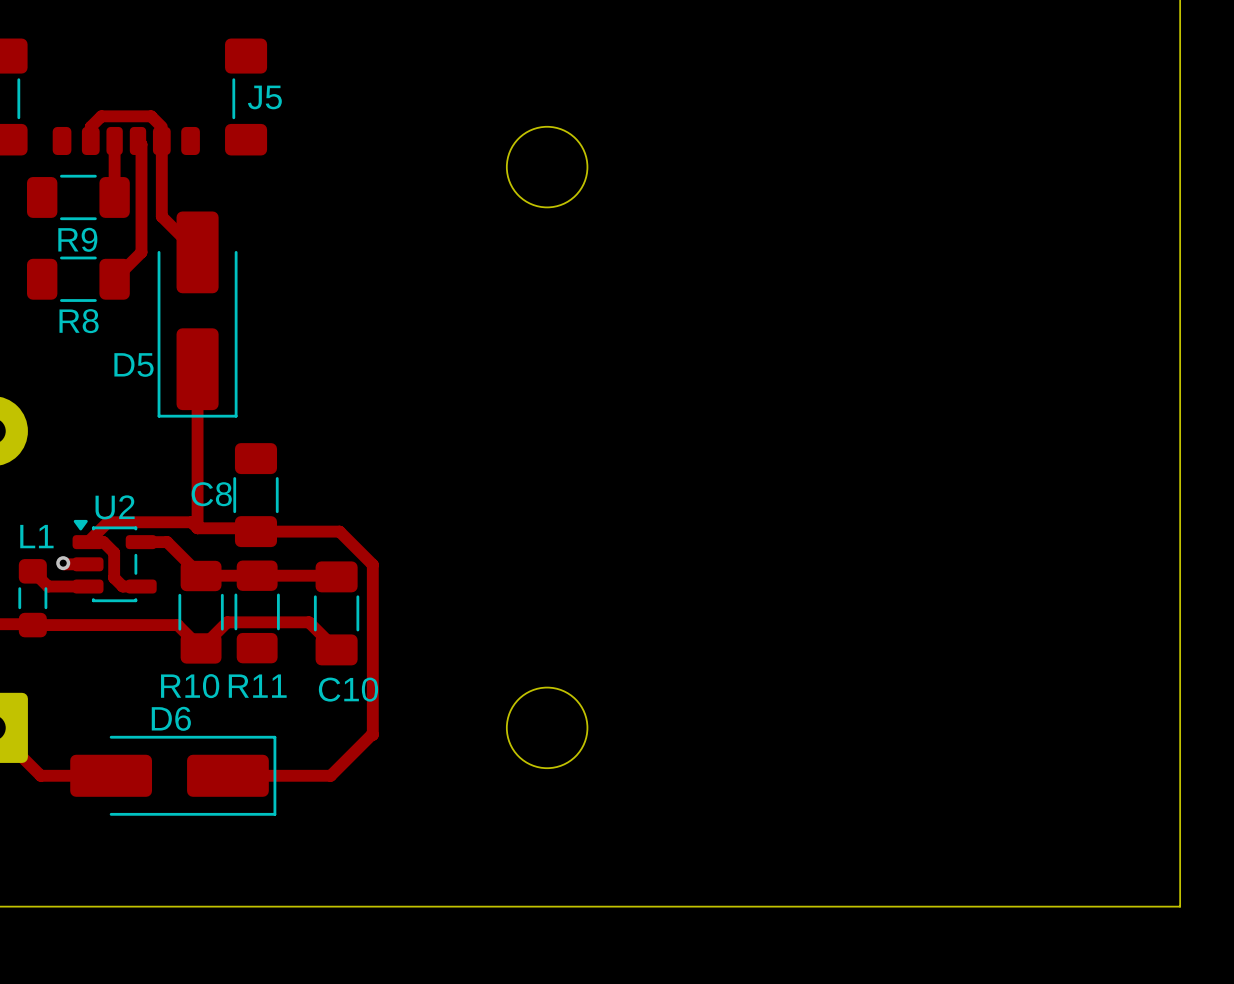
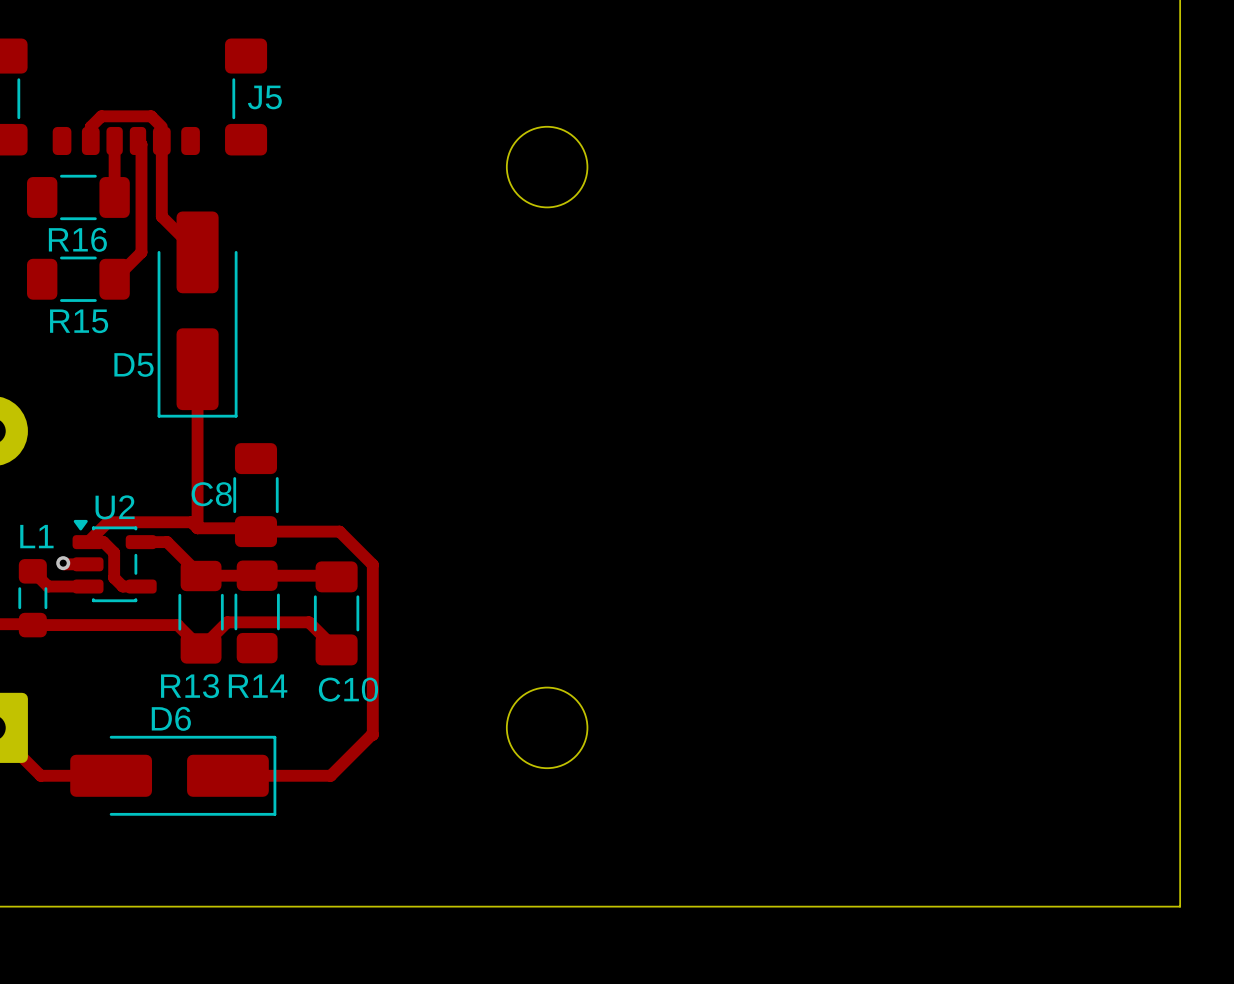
R9 name: R9 (77, 239) -> R16 (77, 239)
R8 name: R8 (79, 321) -> R15 (79, 321)
R10 name: R10 (190, 686) -> R13 (190, 686)
R11 name: R11 (257, 686) -> R14 (258, 686)

